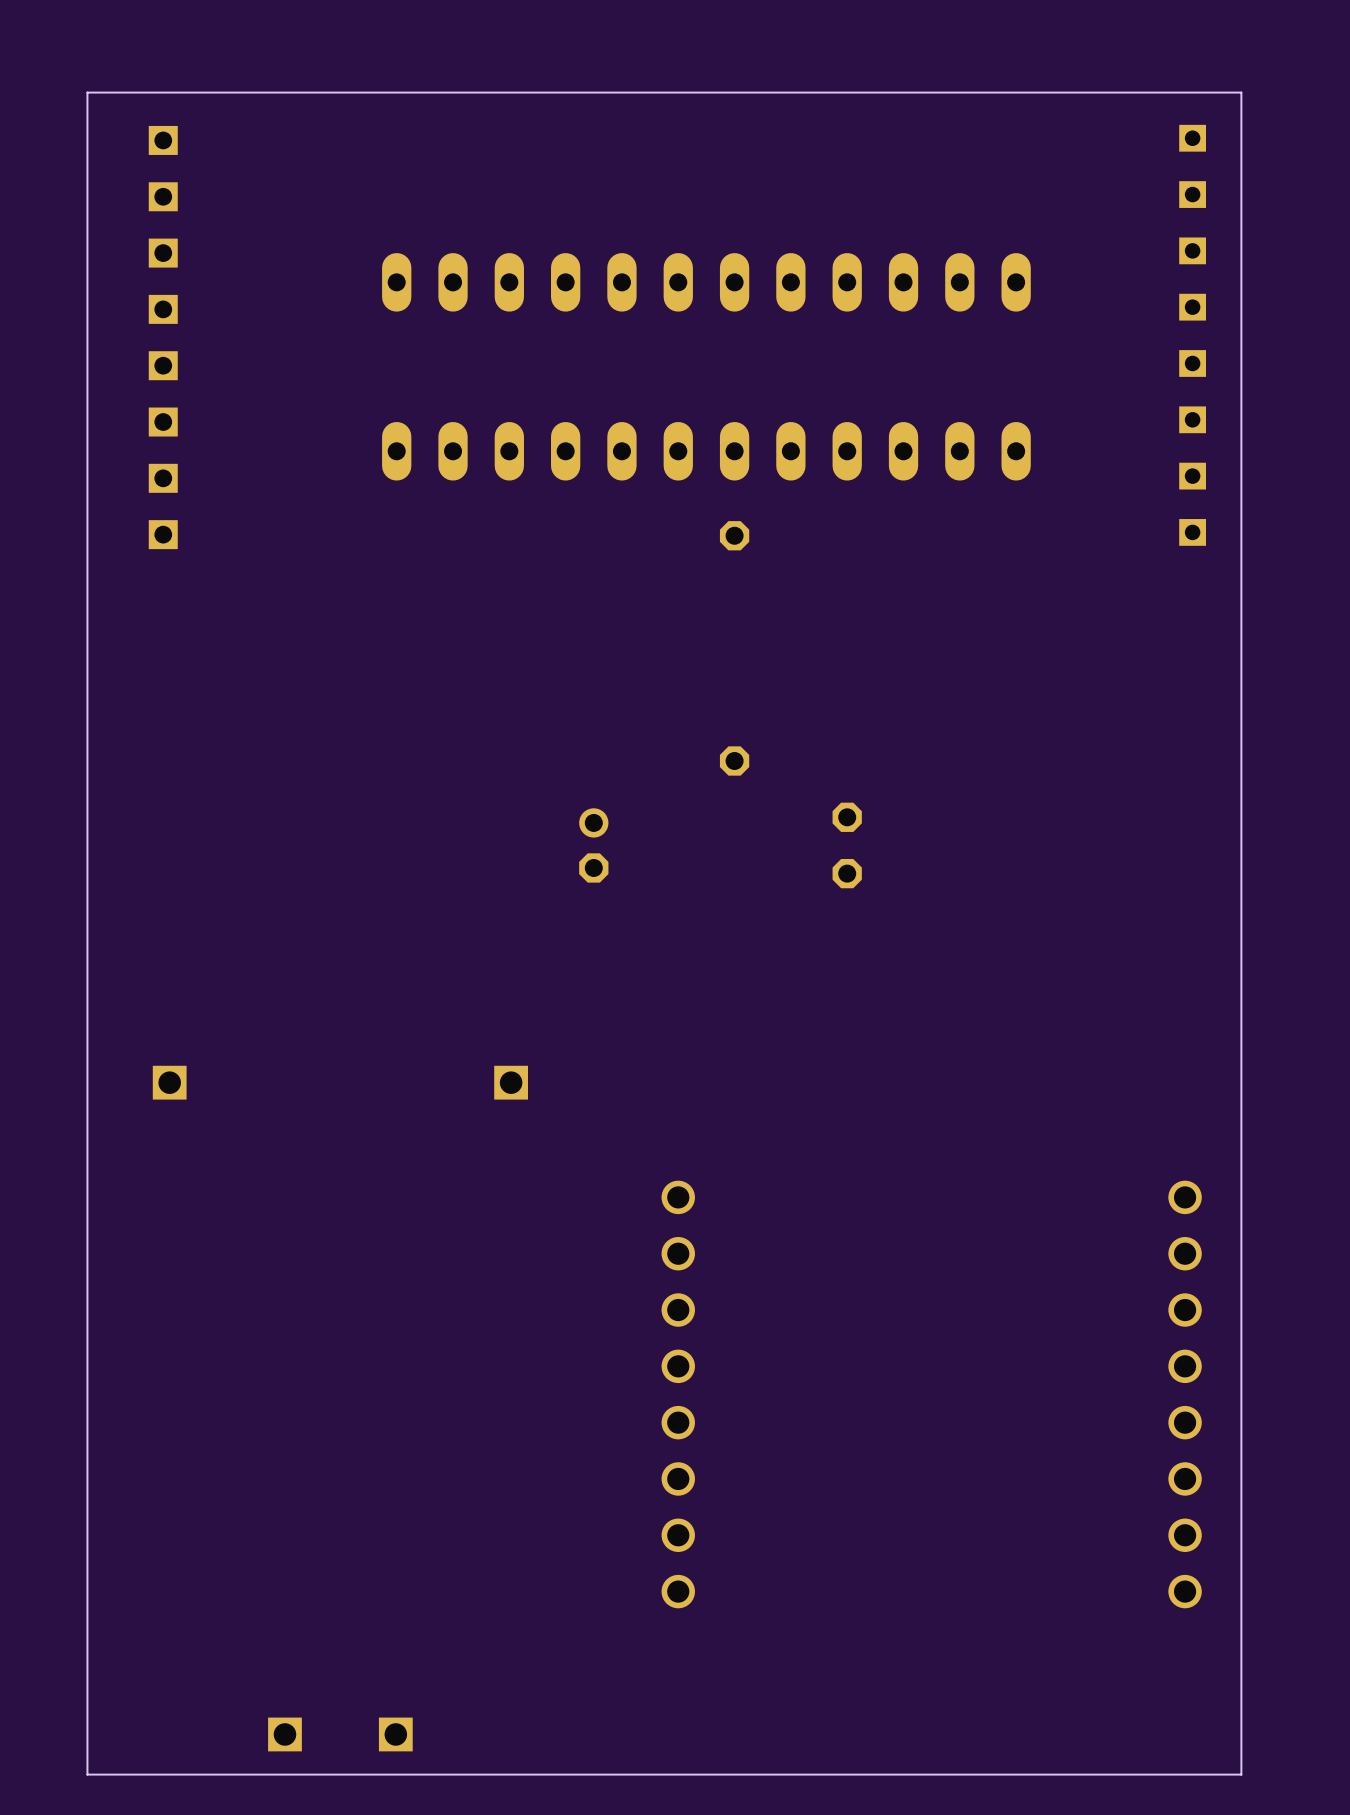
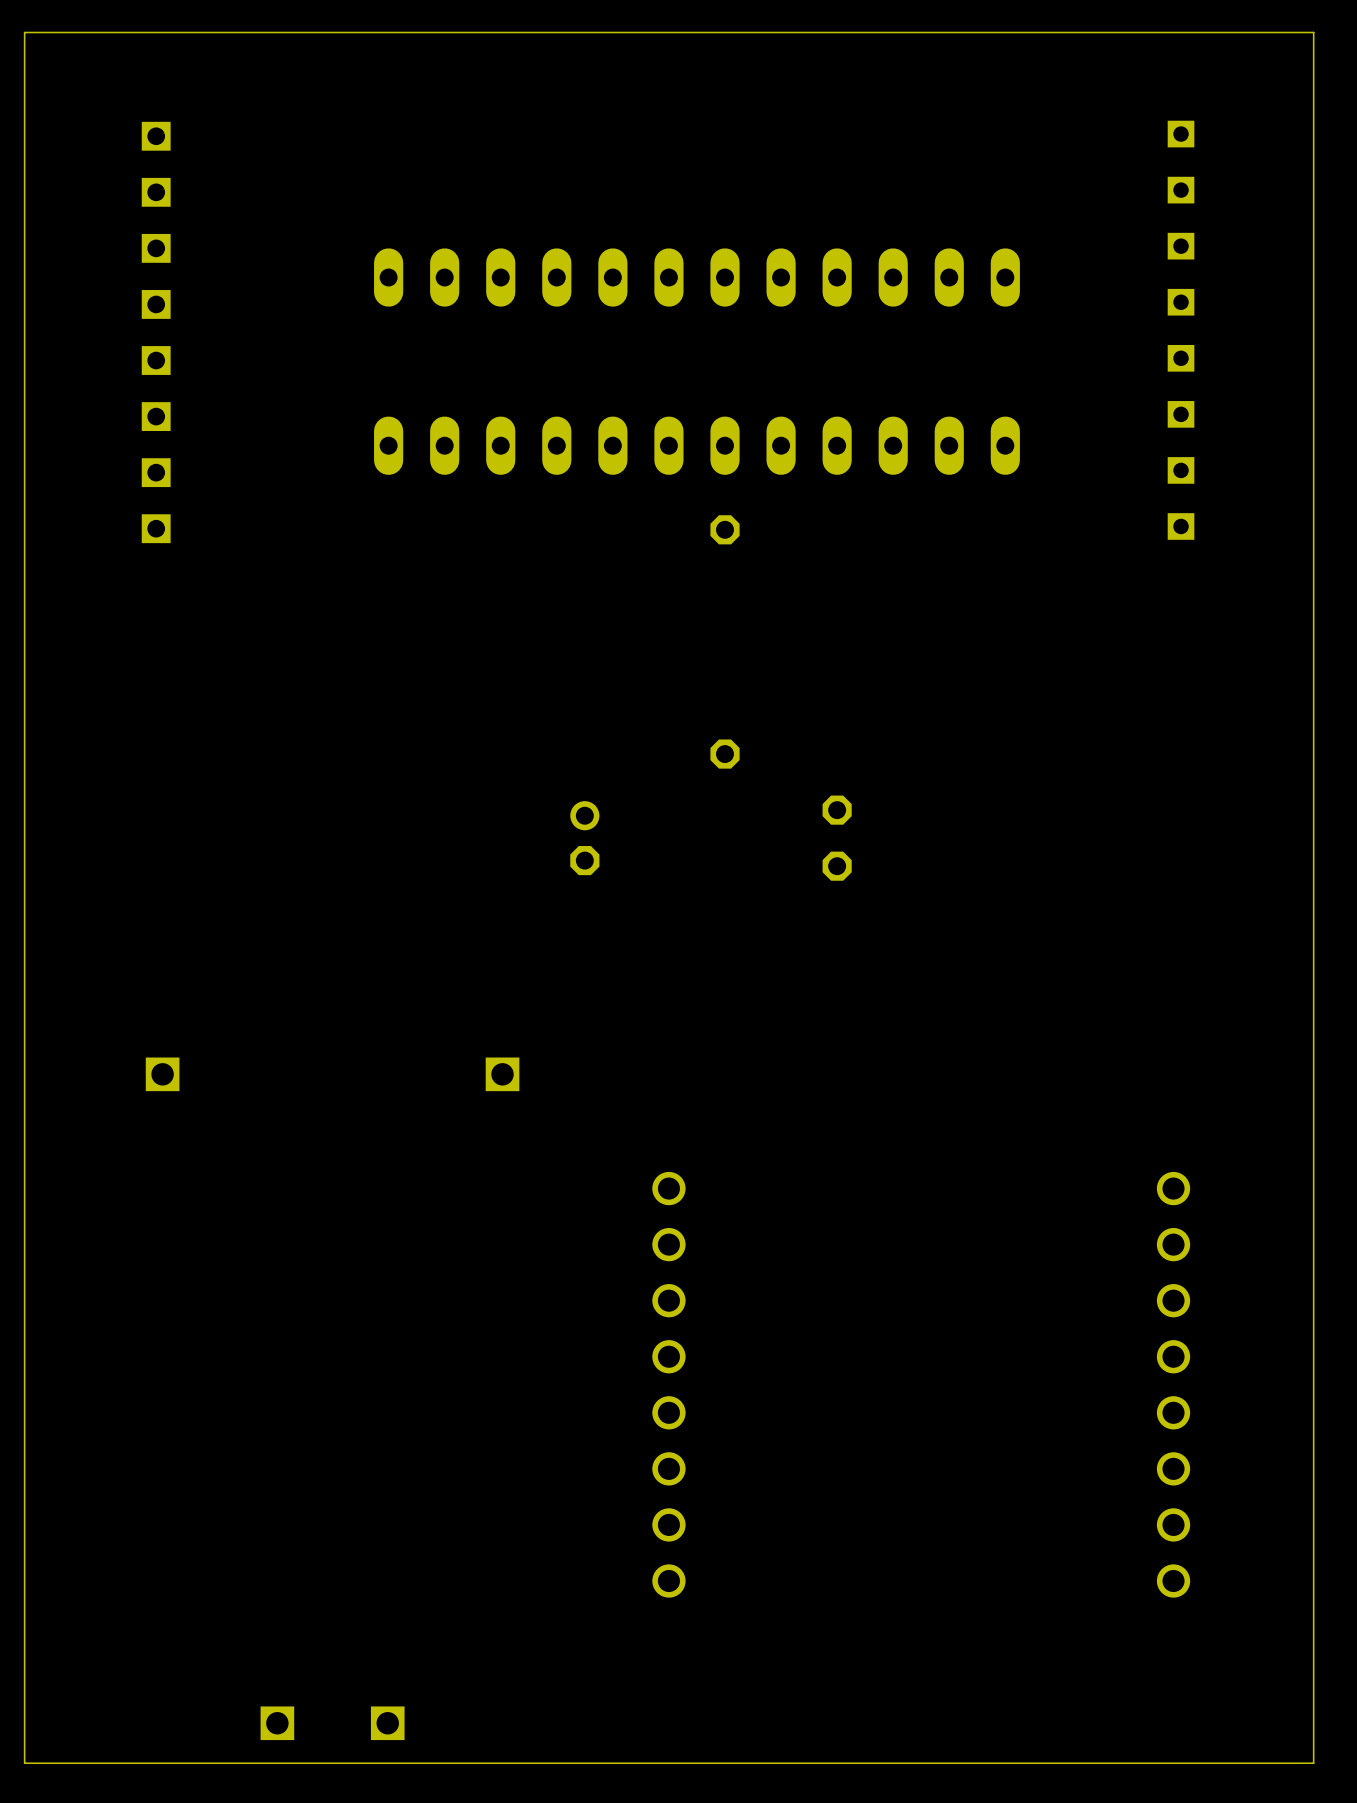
board edge: (1241, 1774) (1241, 92) (87, 92) (87, 1774) -> (1229, 1763) (1313, 1763) (1313, 32) (24, 32) (24, 1763) (80, 1763)

